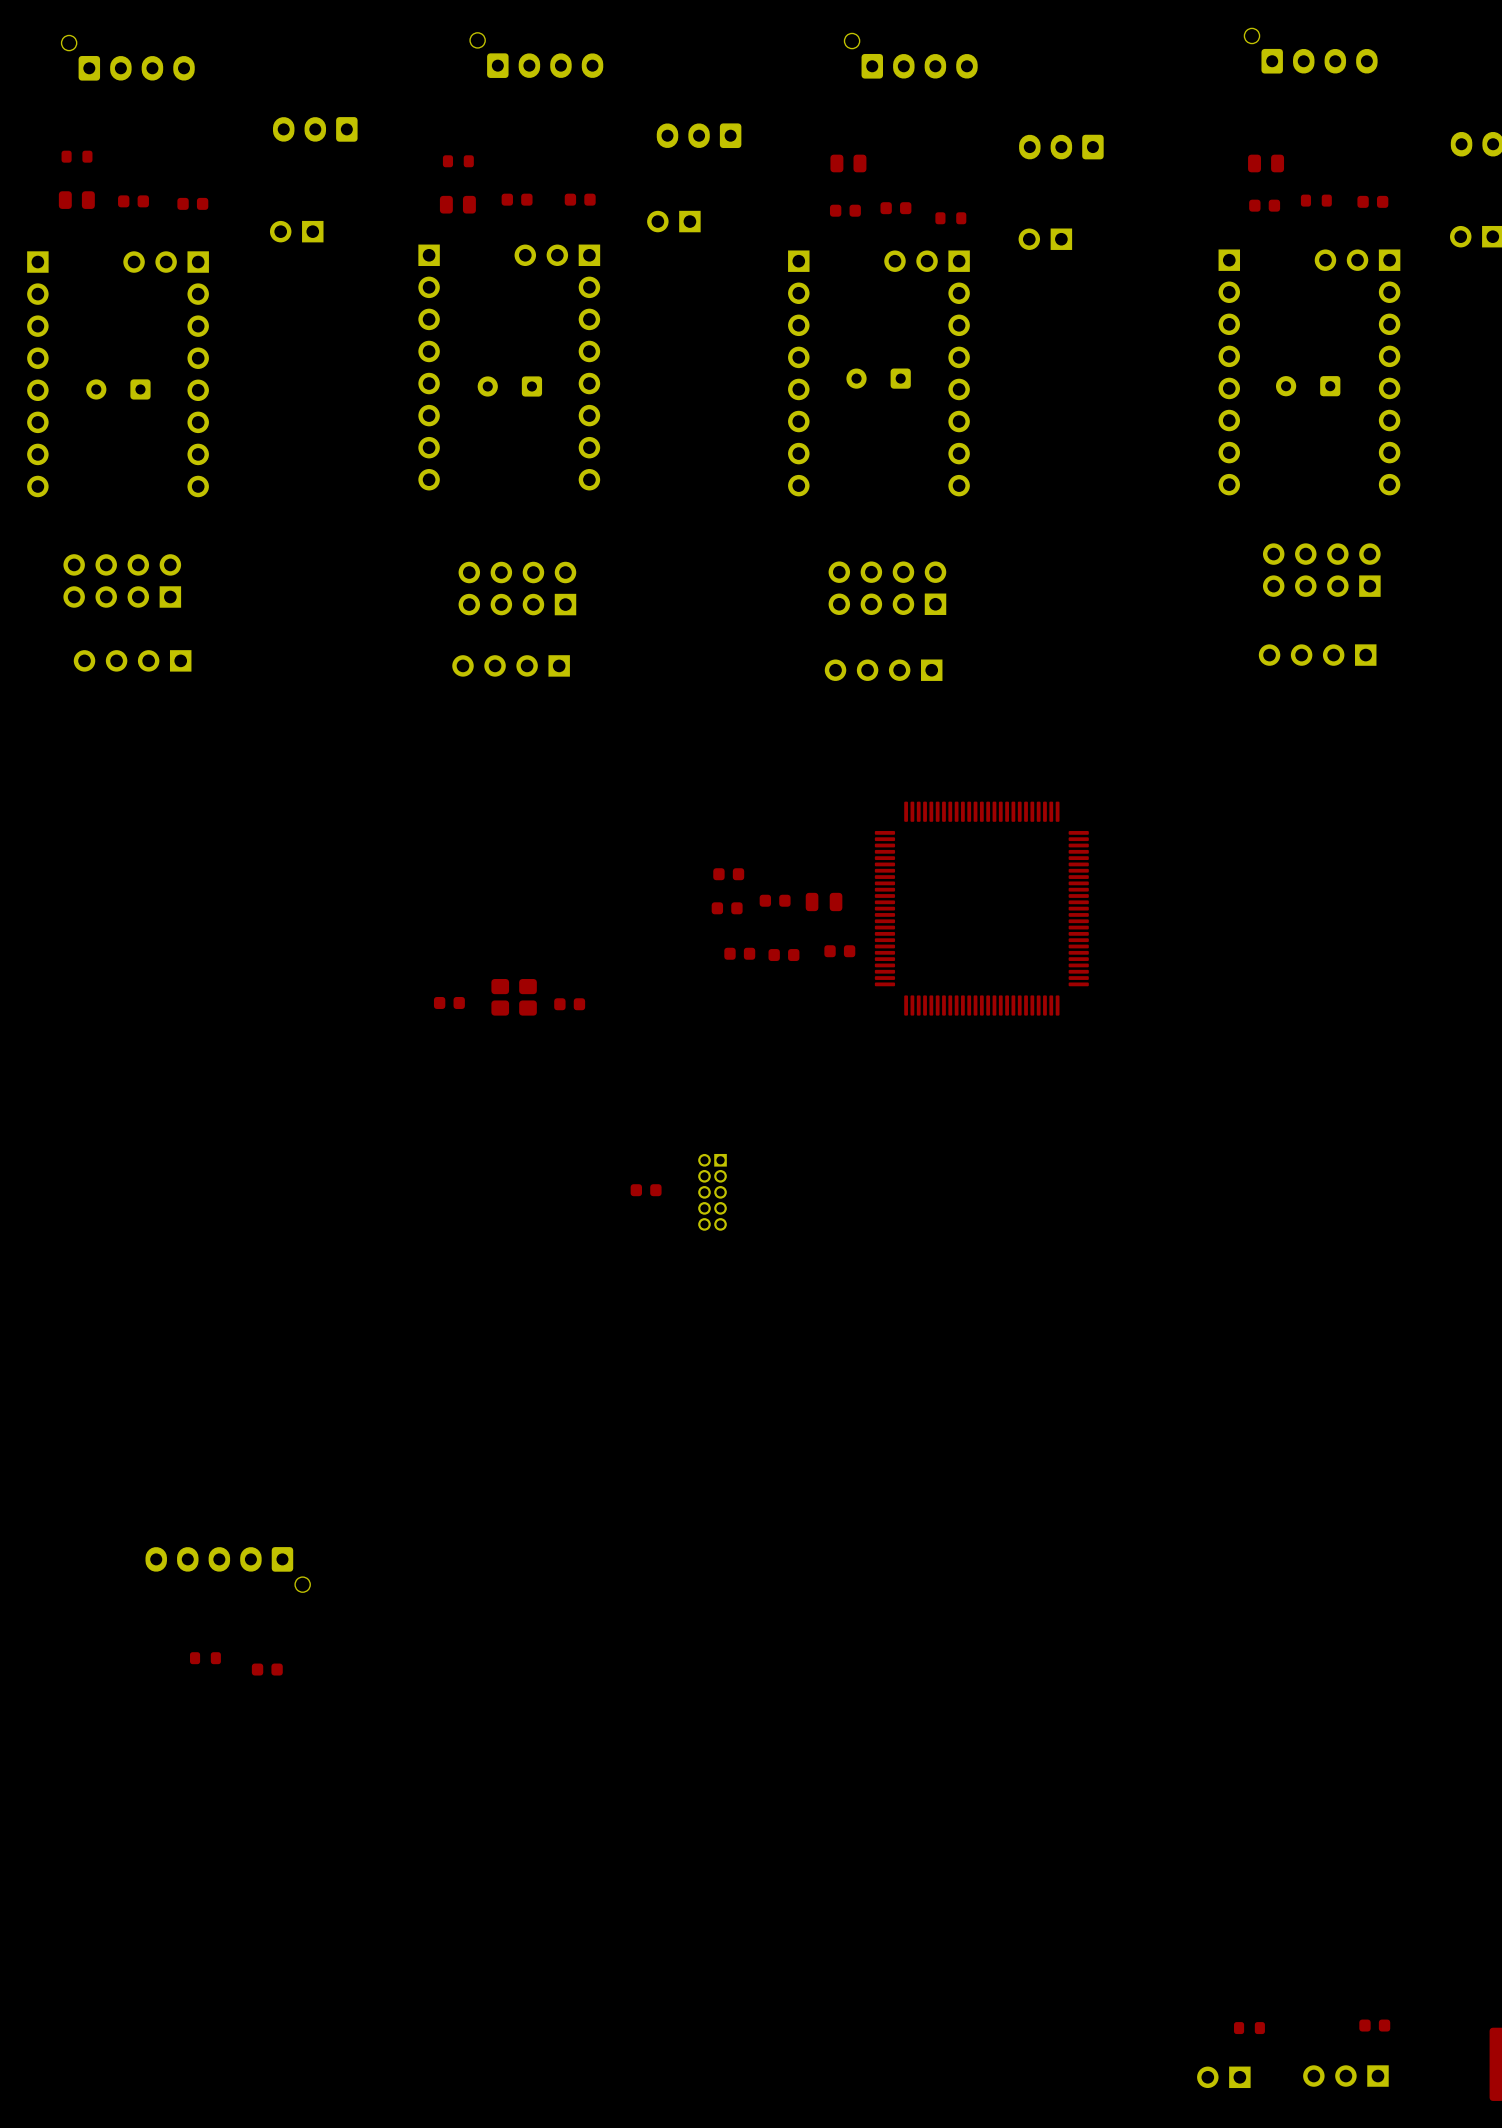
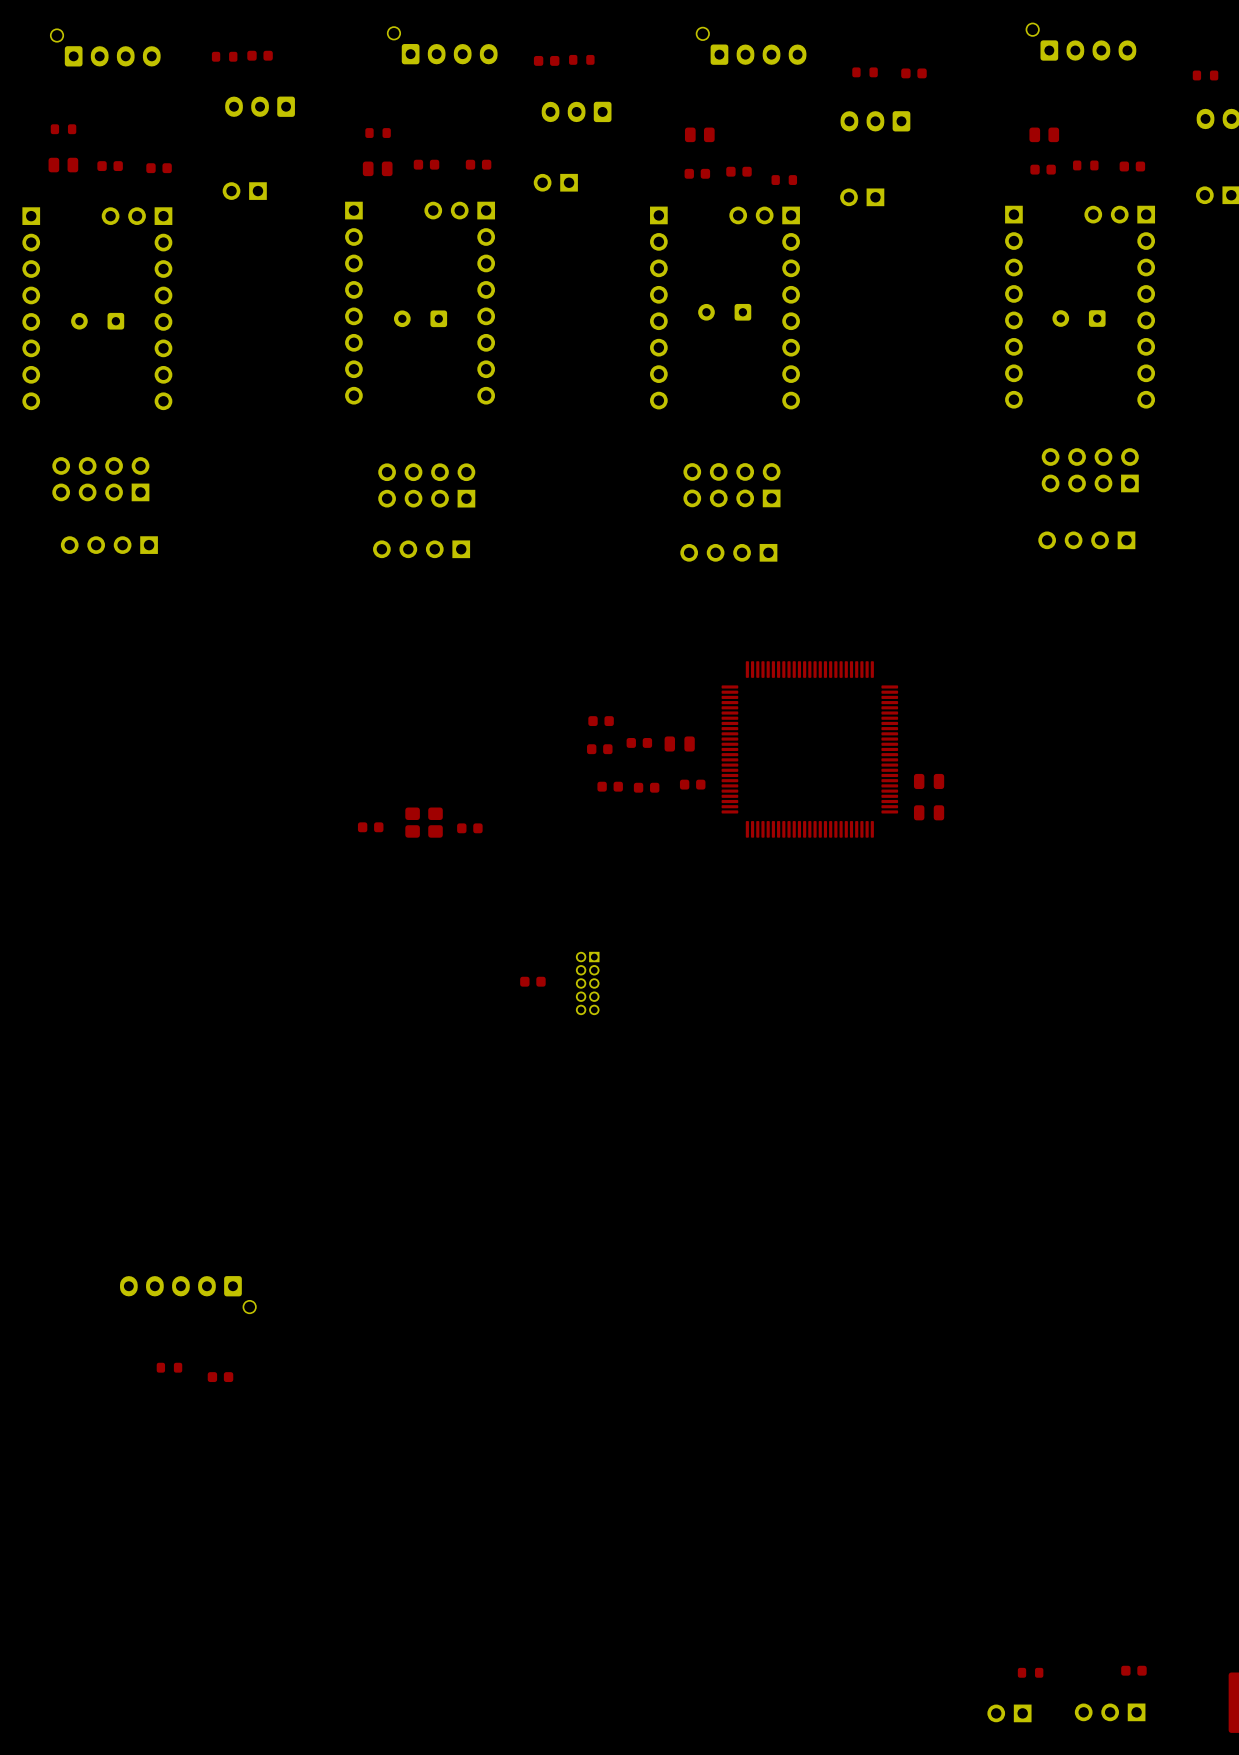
part: none -> (260, 55)
part: none -> (224, 56)
part: none -> (581, 59)
part: none -> (546, 60)
part: none -> (865, 72)
part: none -> (913, 73)
part: none -> (1205, 75)
part: none -> (929, 781)
part: none -> (929, 812)

